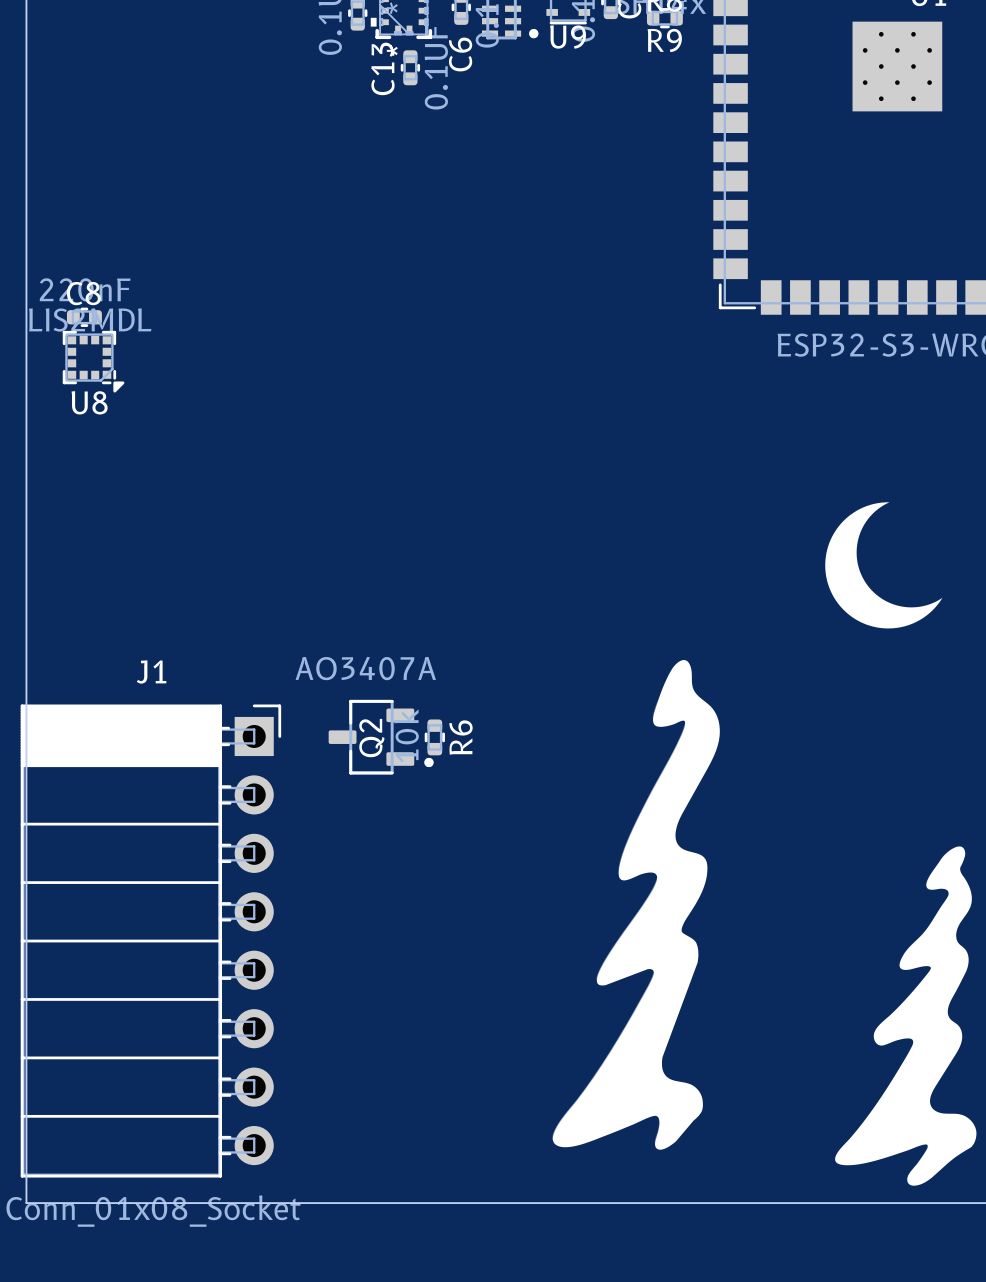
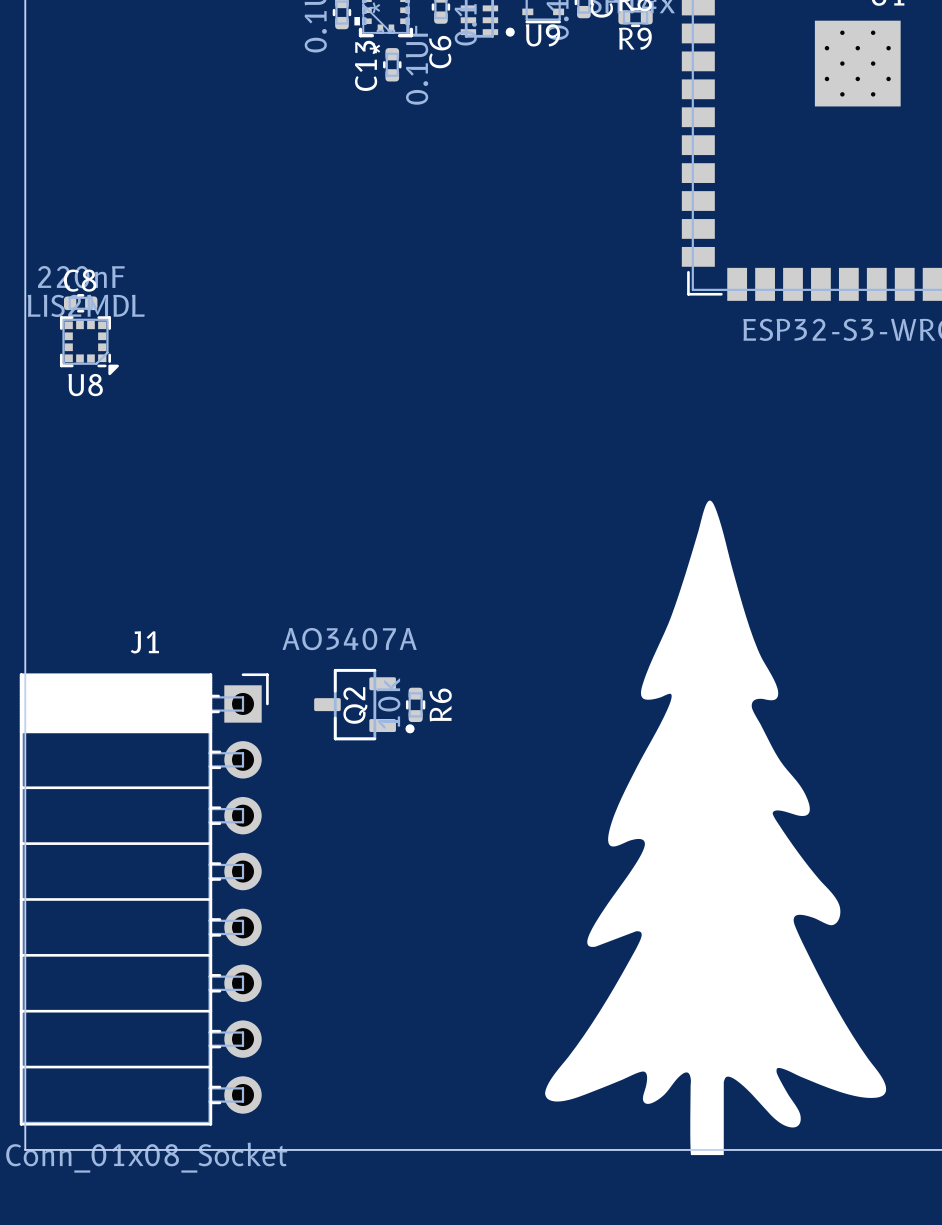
drawing: [825, 502, 943, 629] -> none
drawing: none -> [545, 500, 887, 1156]
drawing: [552, 660, 720, 1150] -> none
drawing: [835, 846, 977, 1186] -> none

